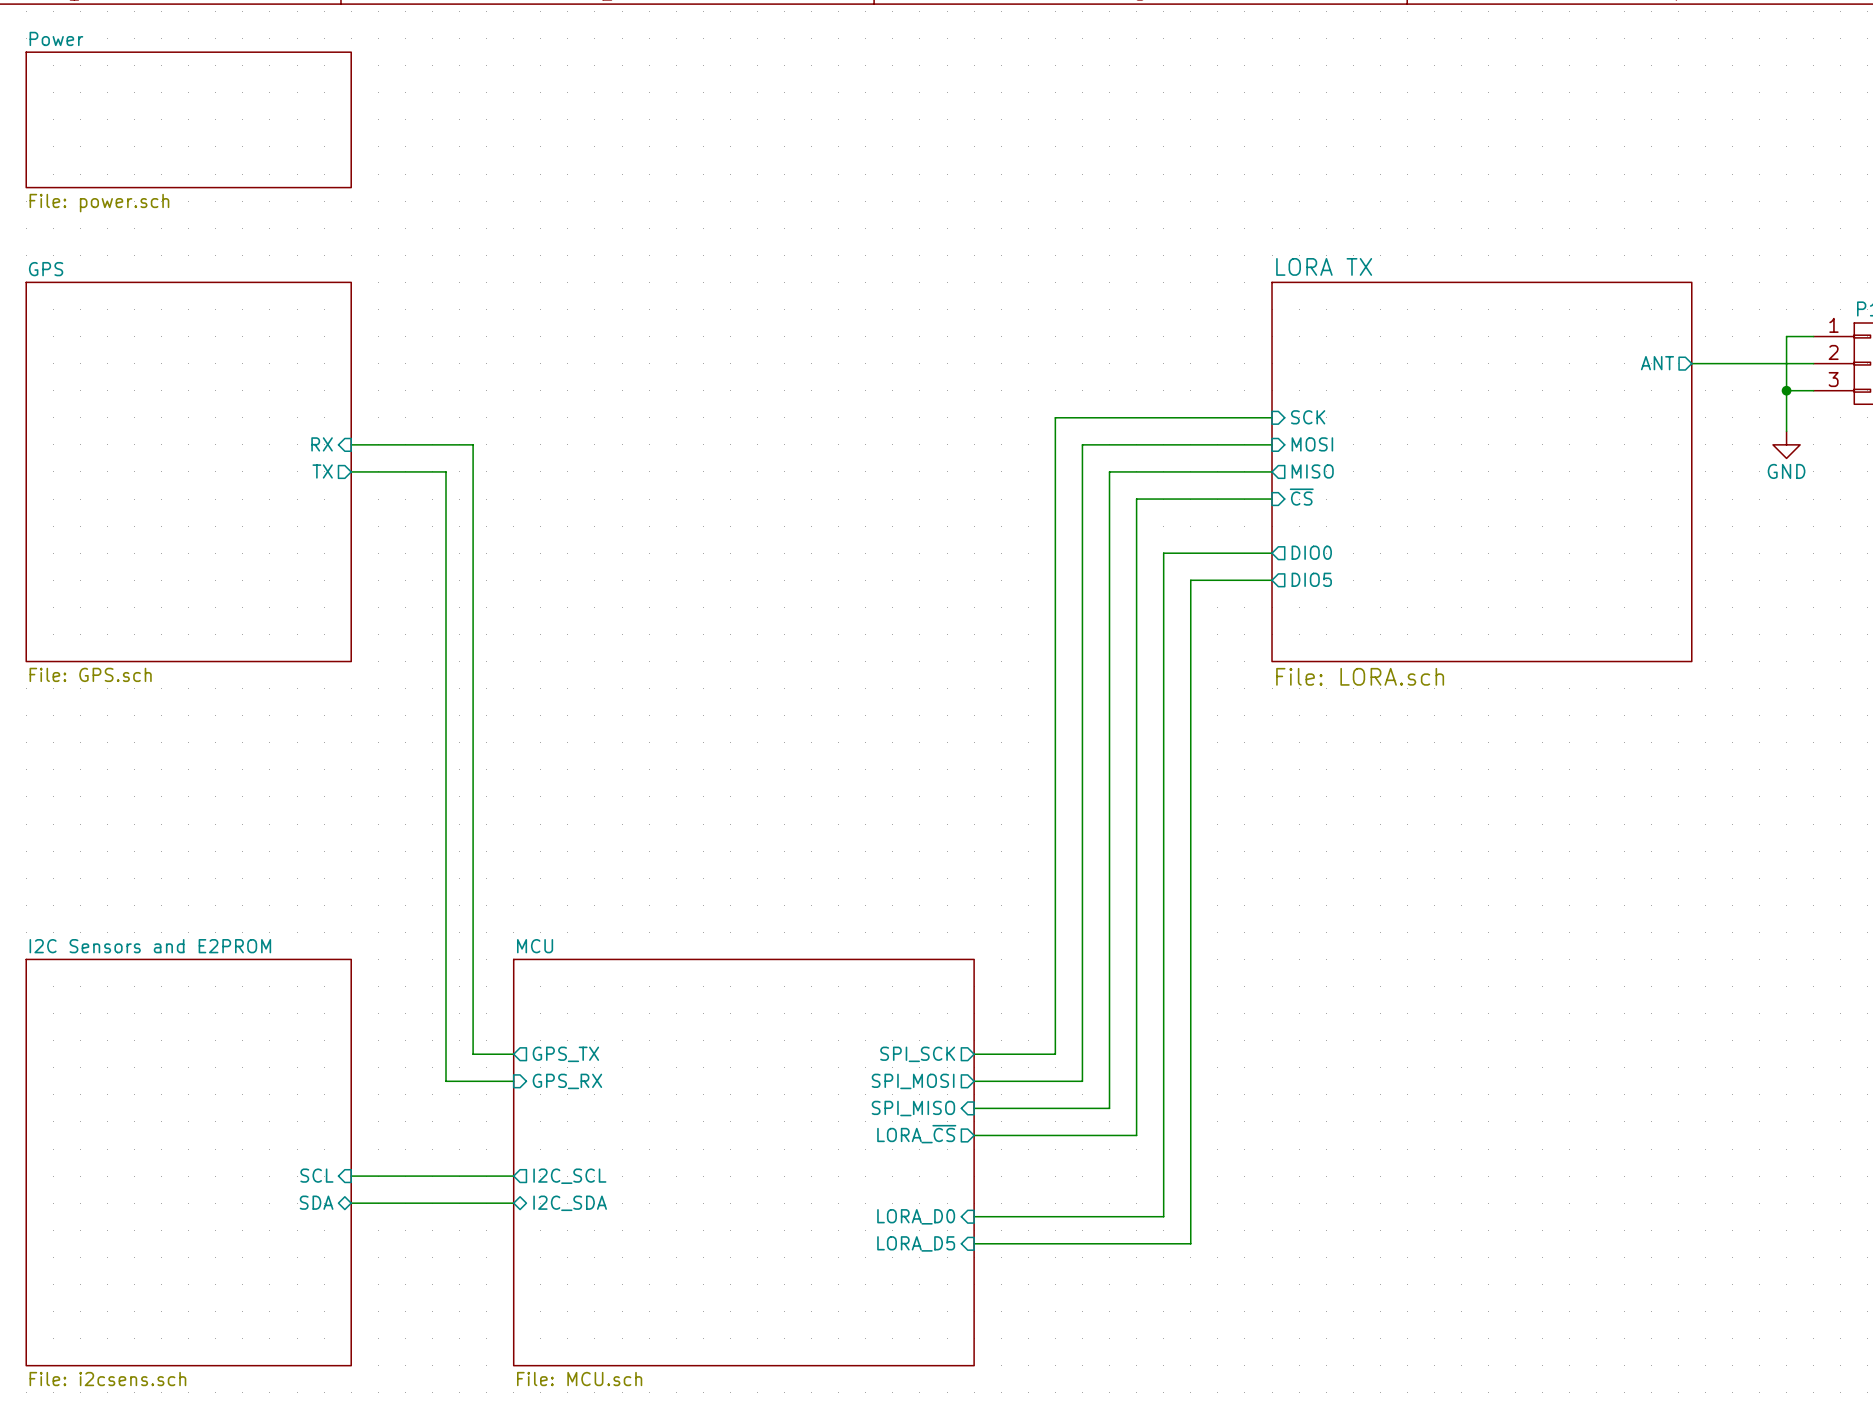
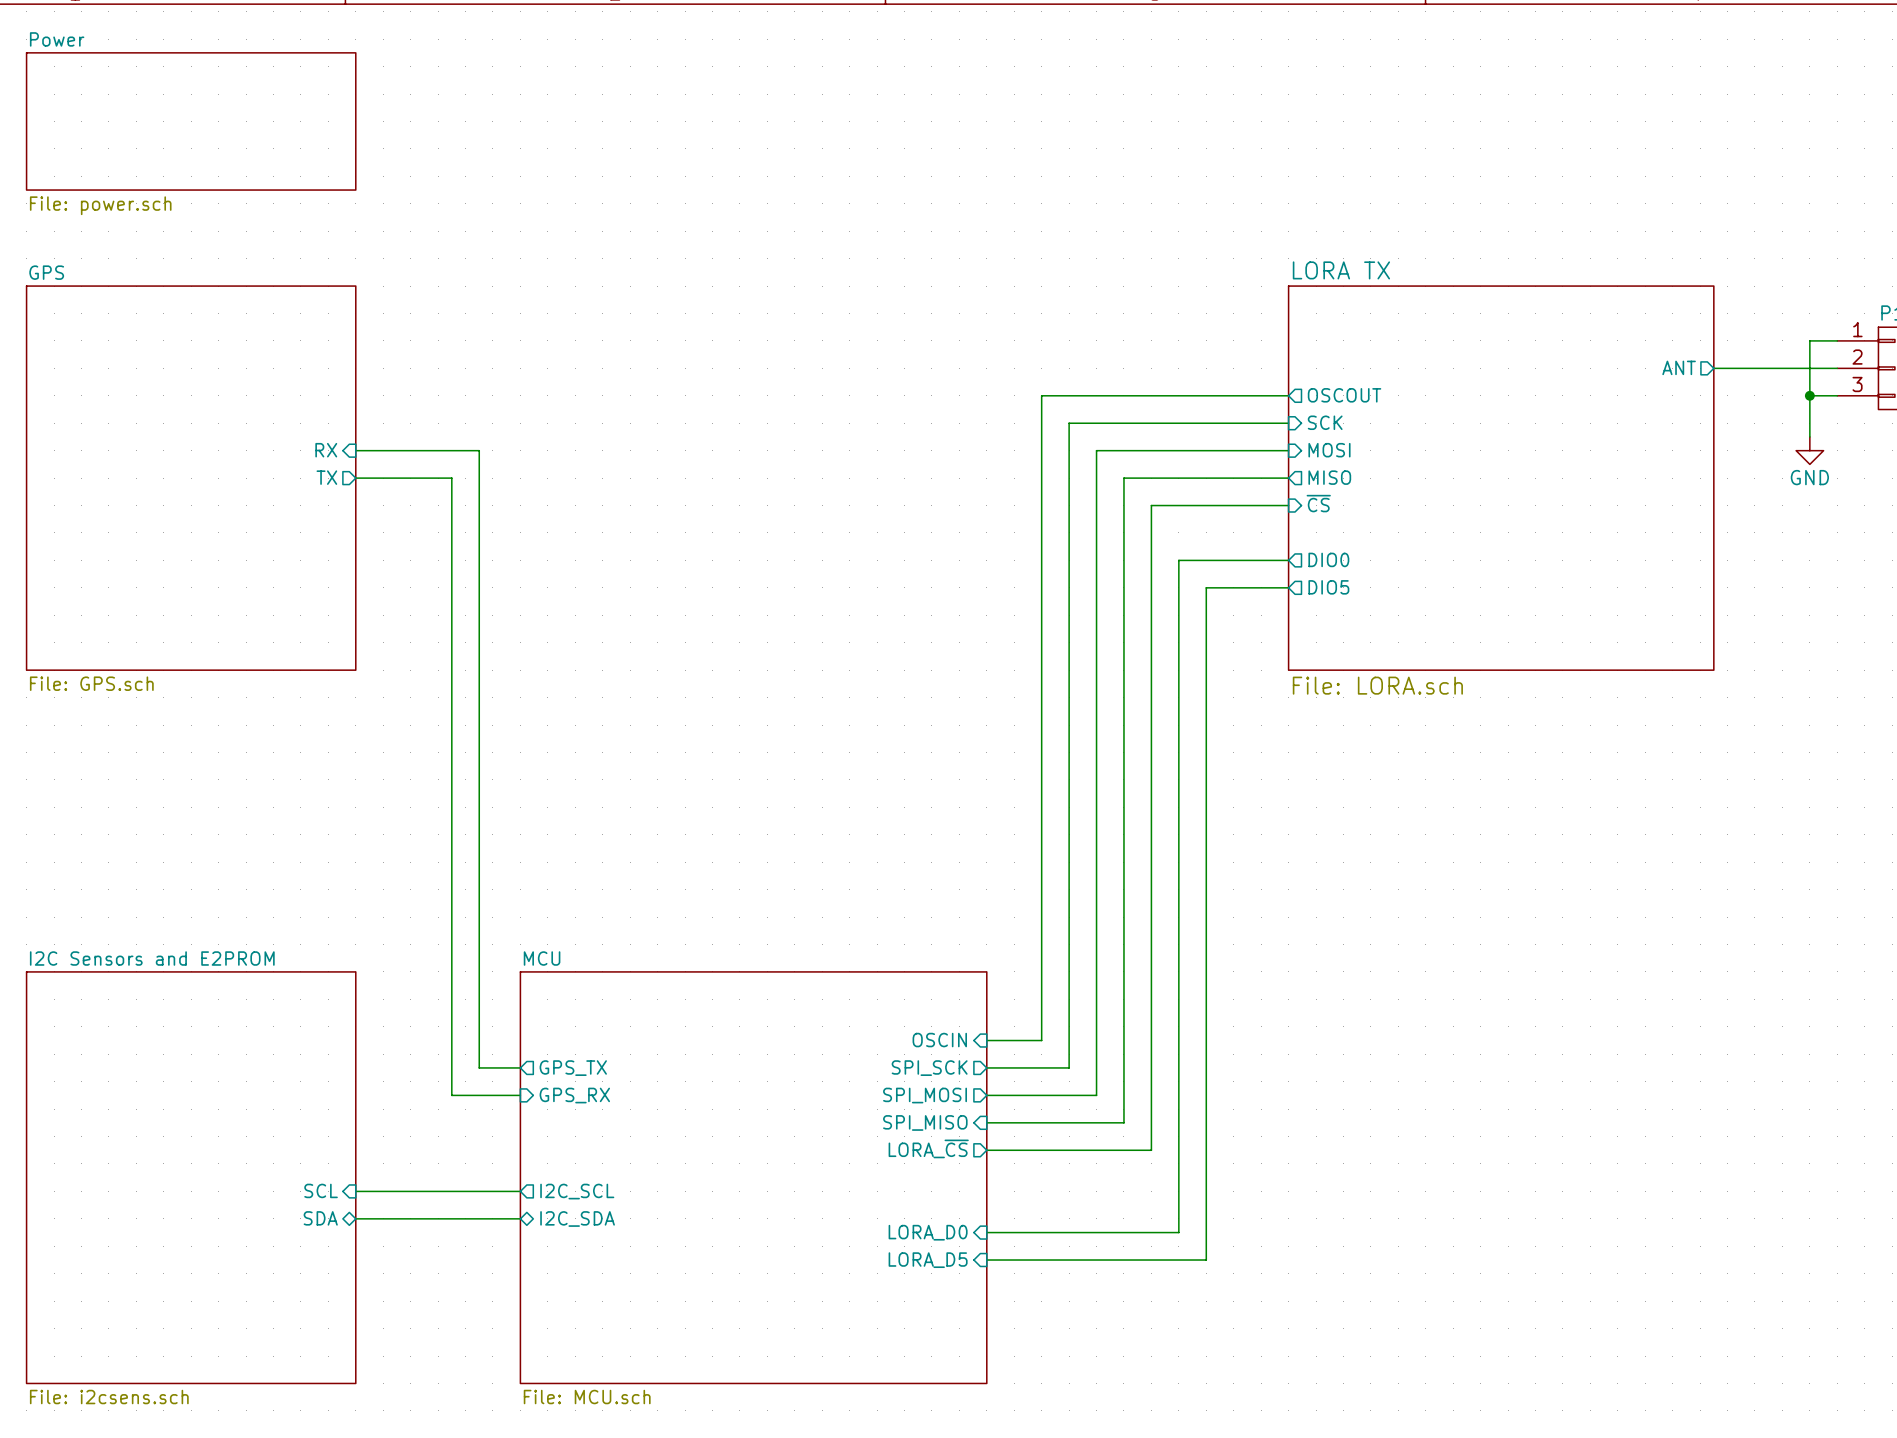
wire: none -> (1288, 395) (1041, 395) (1041, 1040) (986, 1040)
sheet pin: none -> OSCOUT (1344, 395)
sheet pin: none -> OSCIN (939, 1040)

